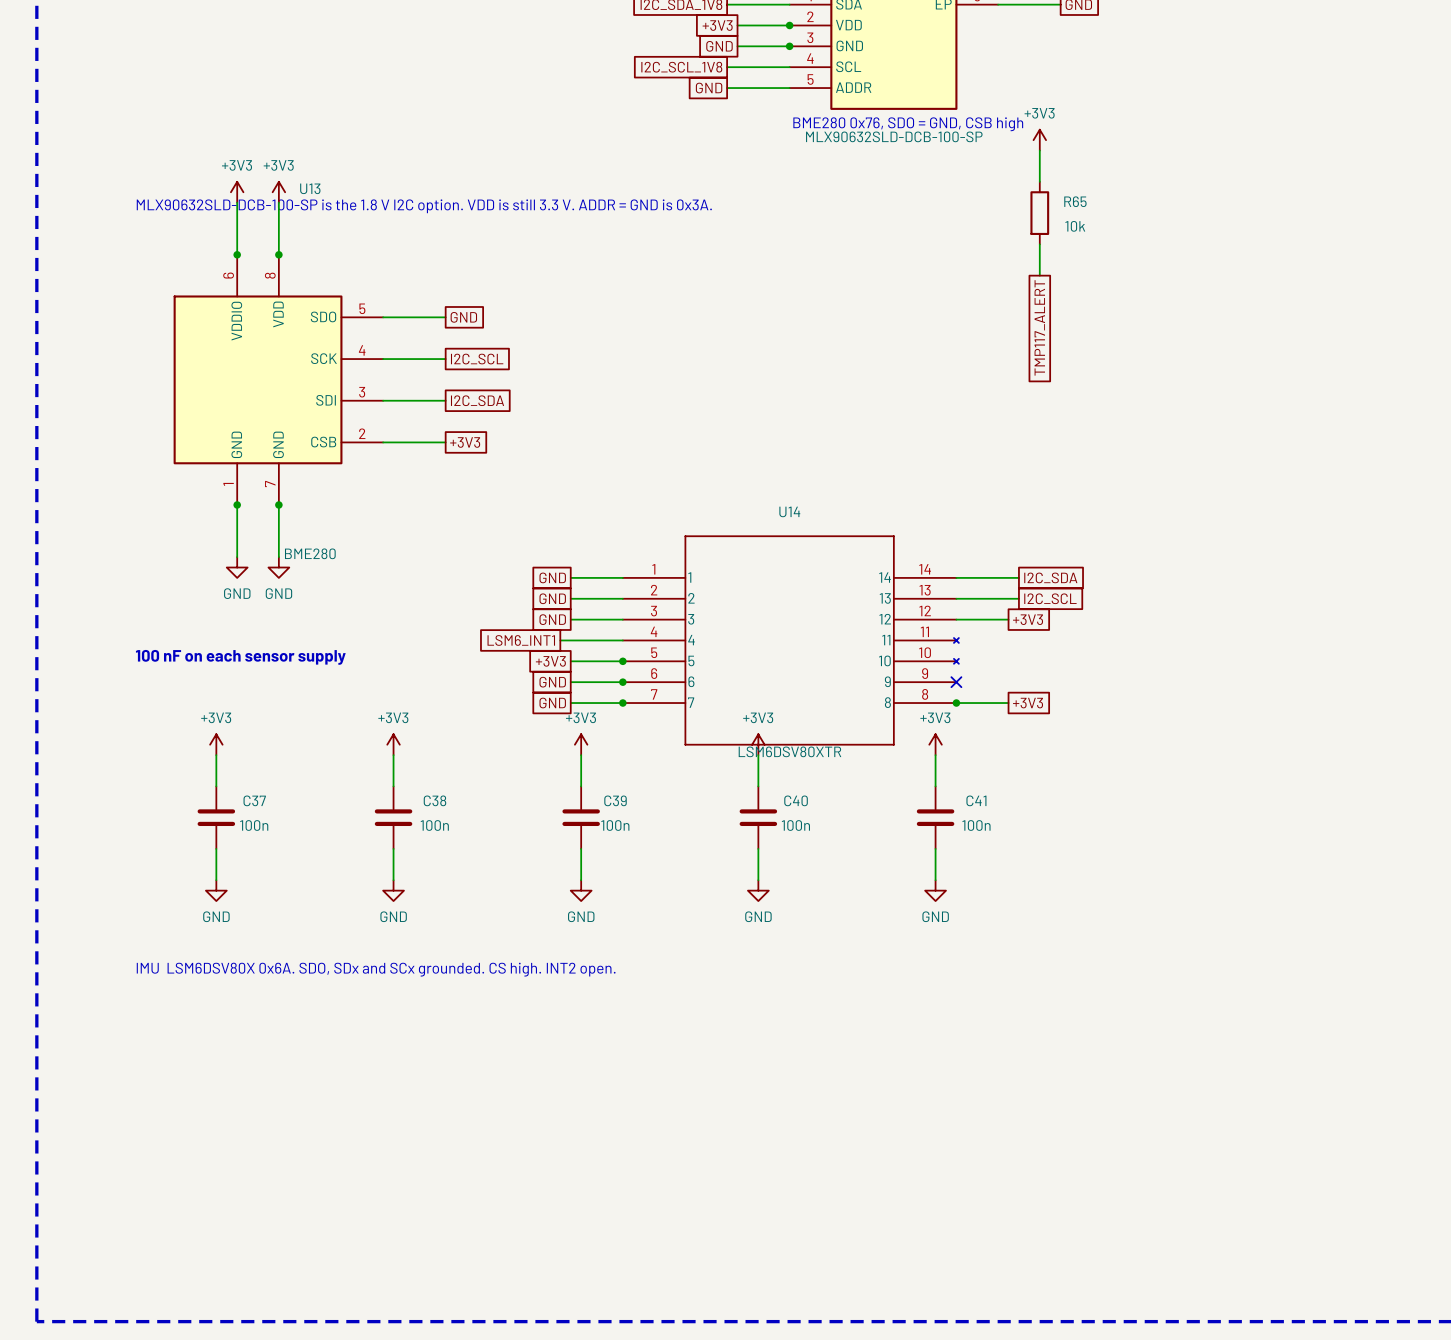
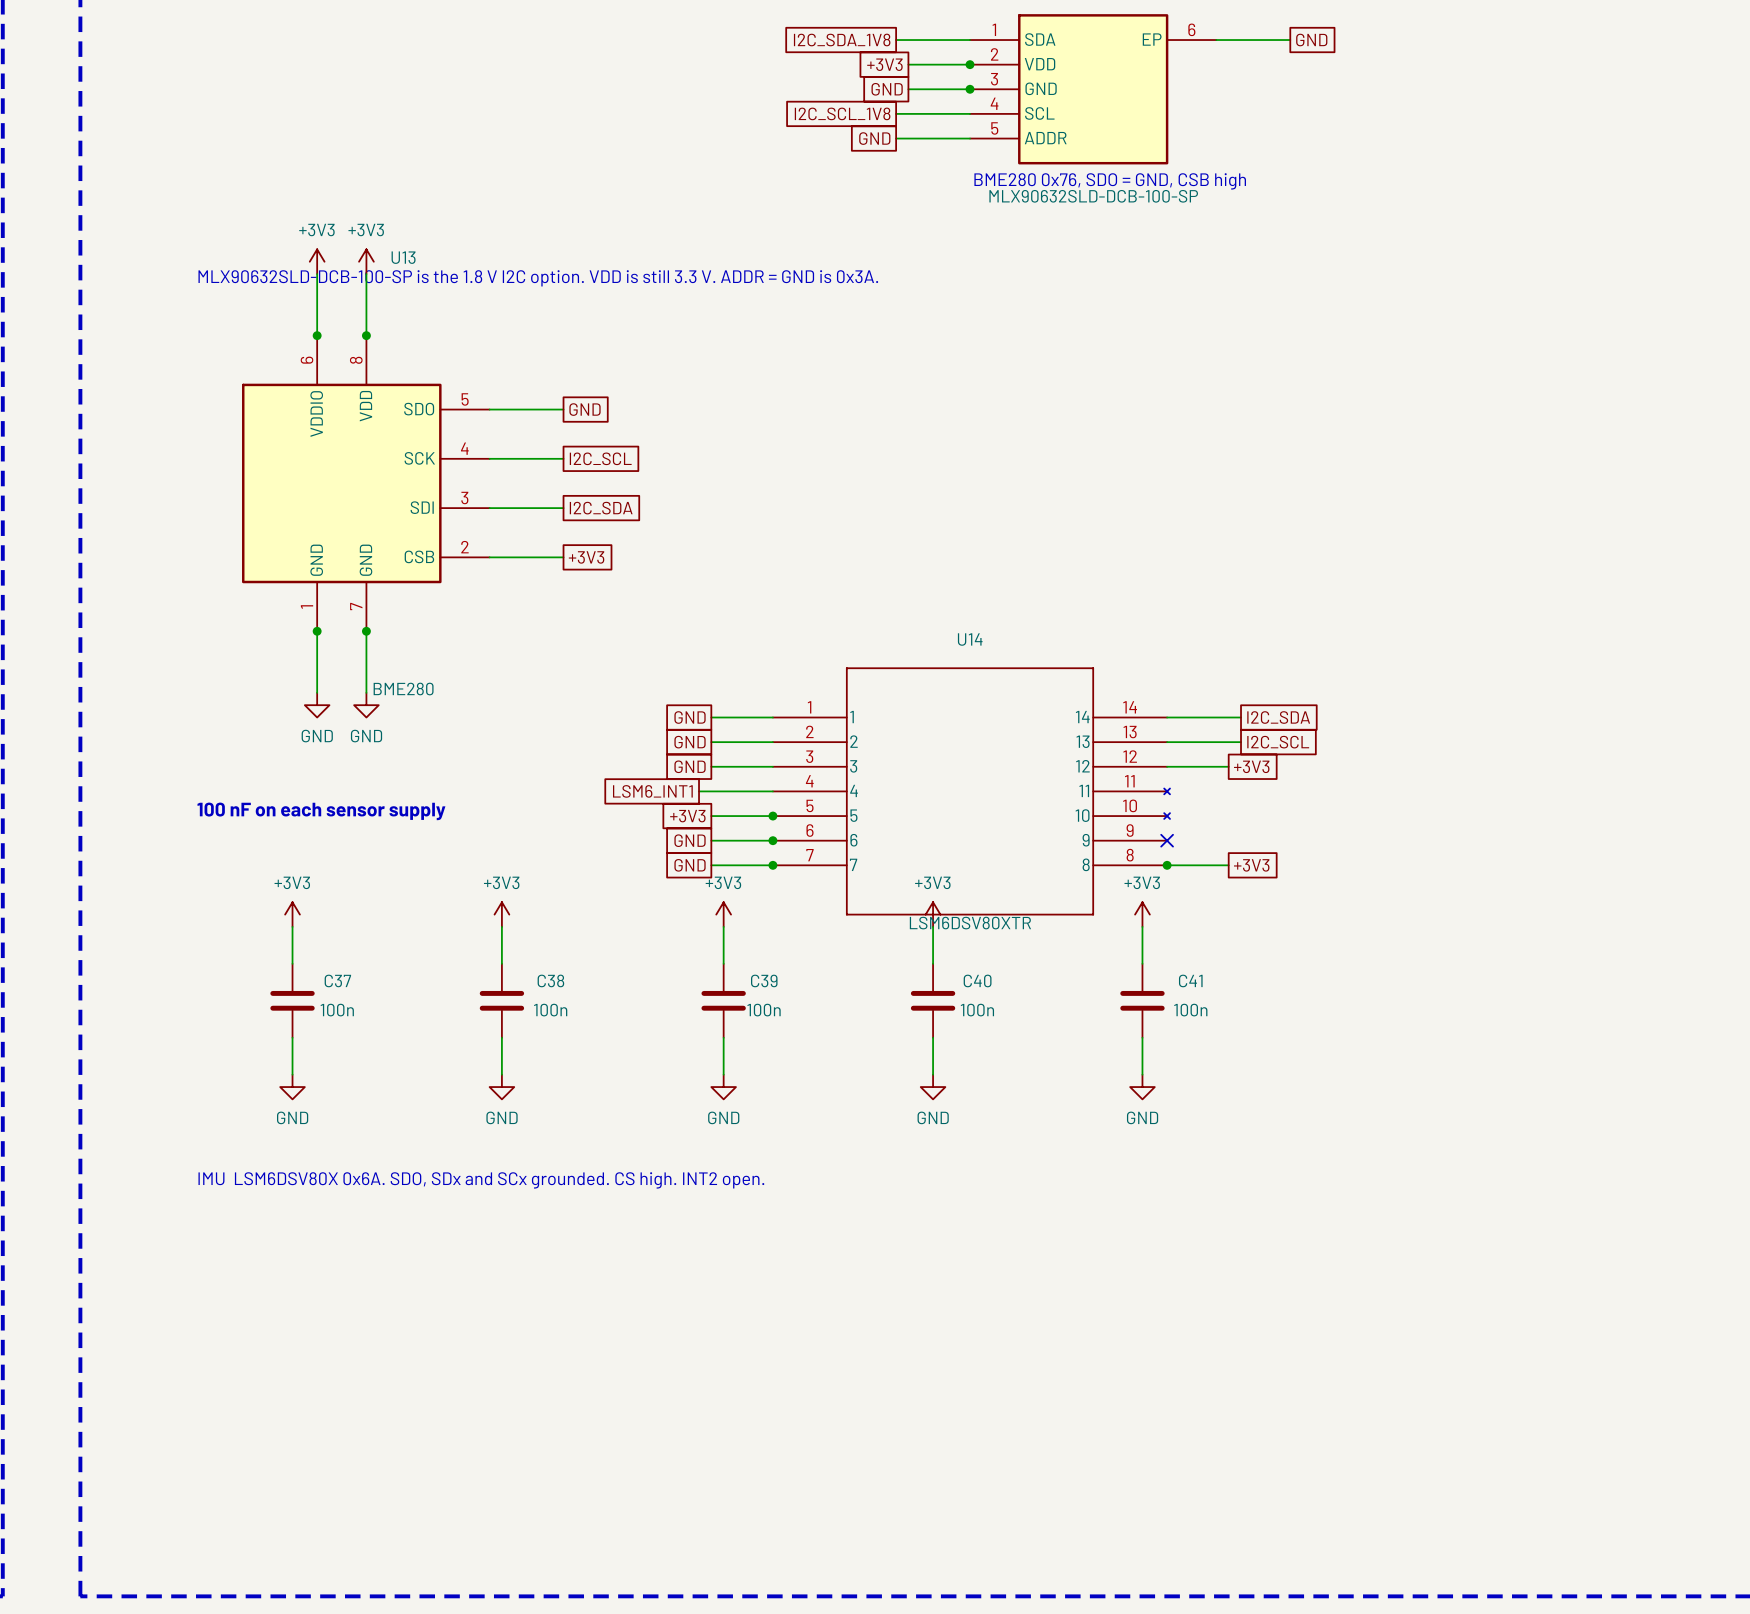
power symbol: +3V3 (1039, 140) -> none
wire: (1039, 150) (1039, 181) -> none
R65: 10k (1039, 213) -> none
wire: (1039, 244) (1039, 275) -> none
global label: TMP117_ALERT (1039, 327) -> none

